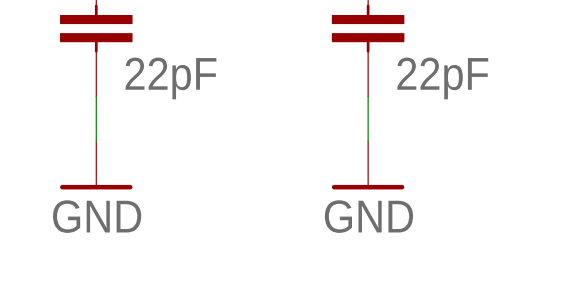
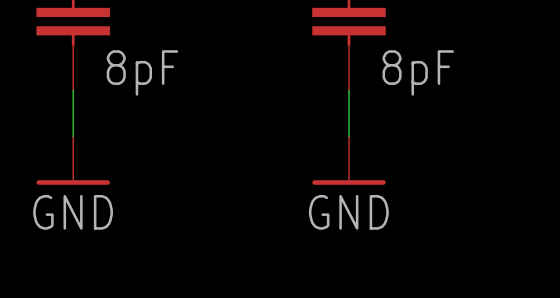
part value: 22pF (170, 78) -> 8pF (142, 72)
part value: 22pF (442, 78) -> 8pF (418, 72)

